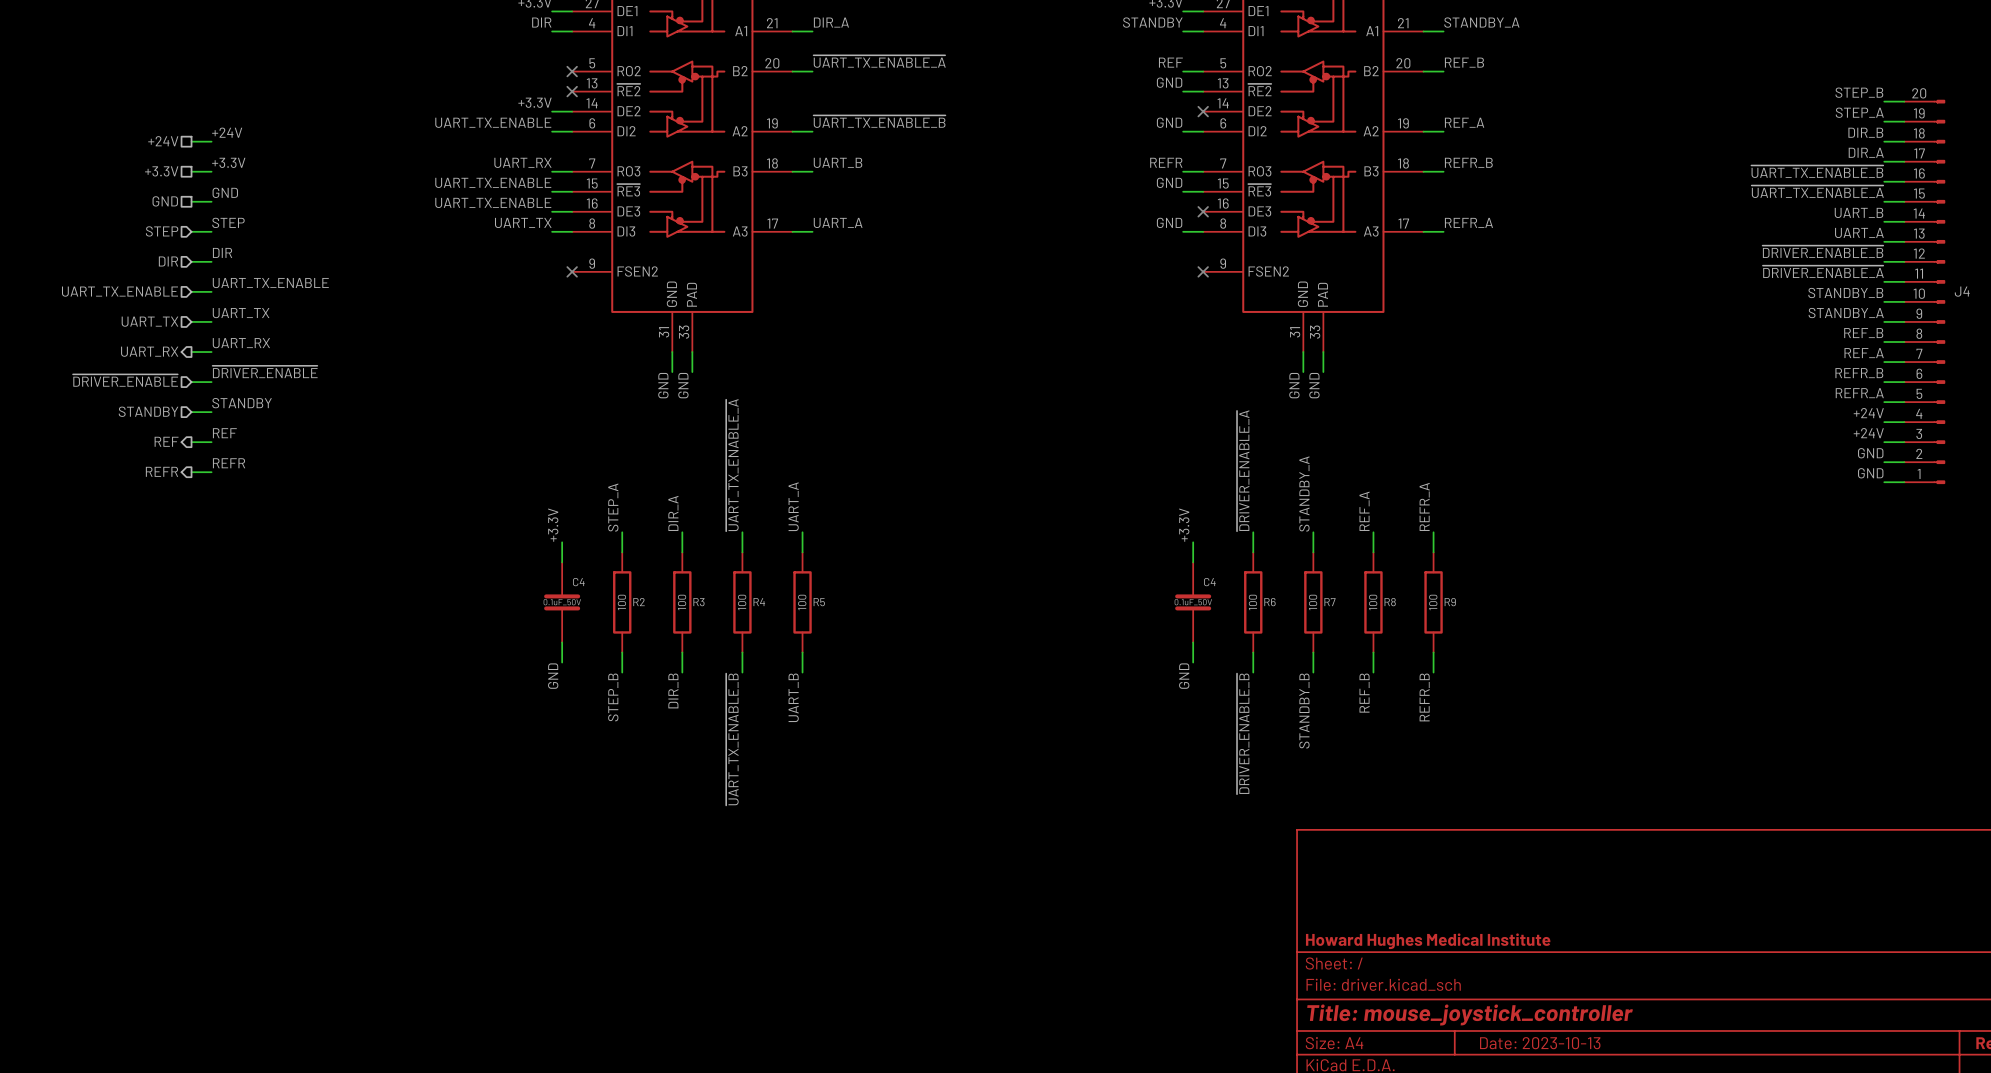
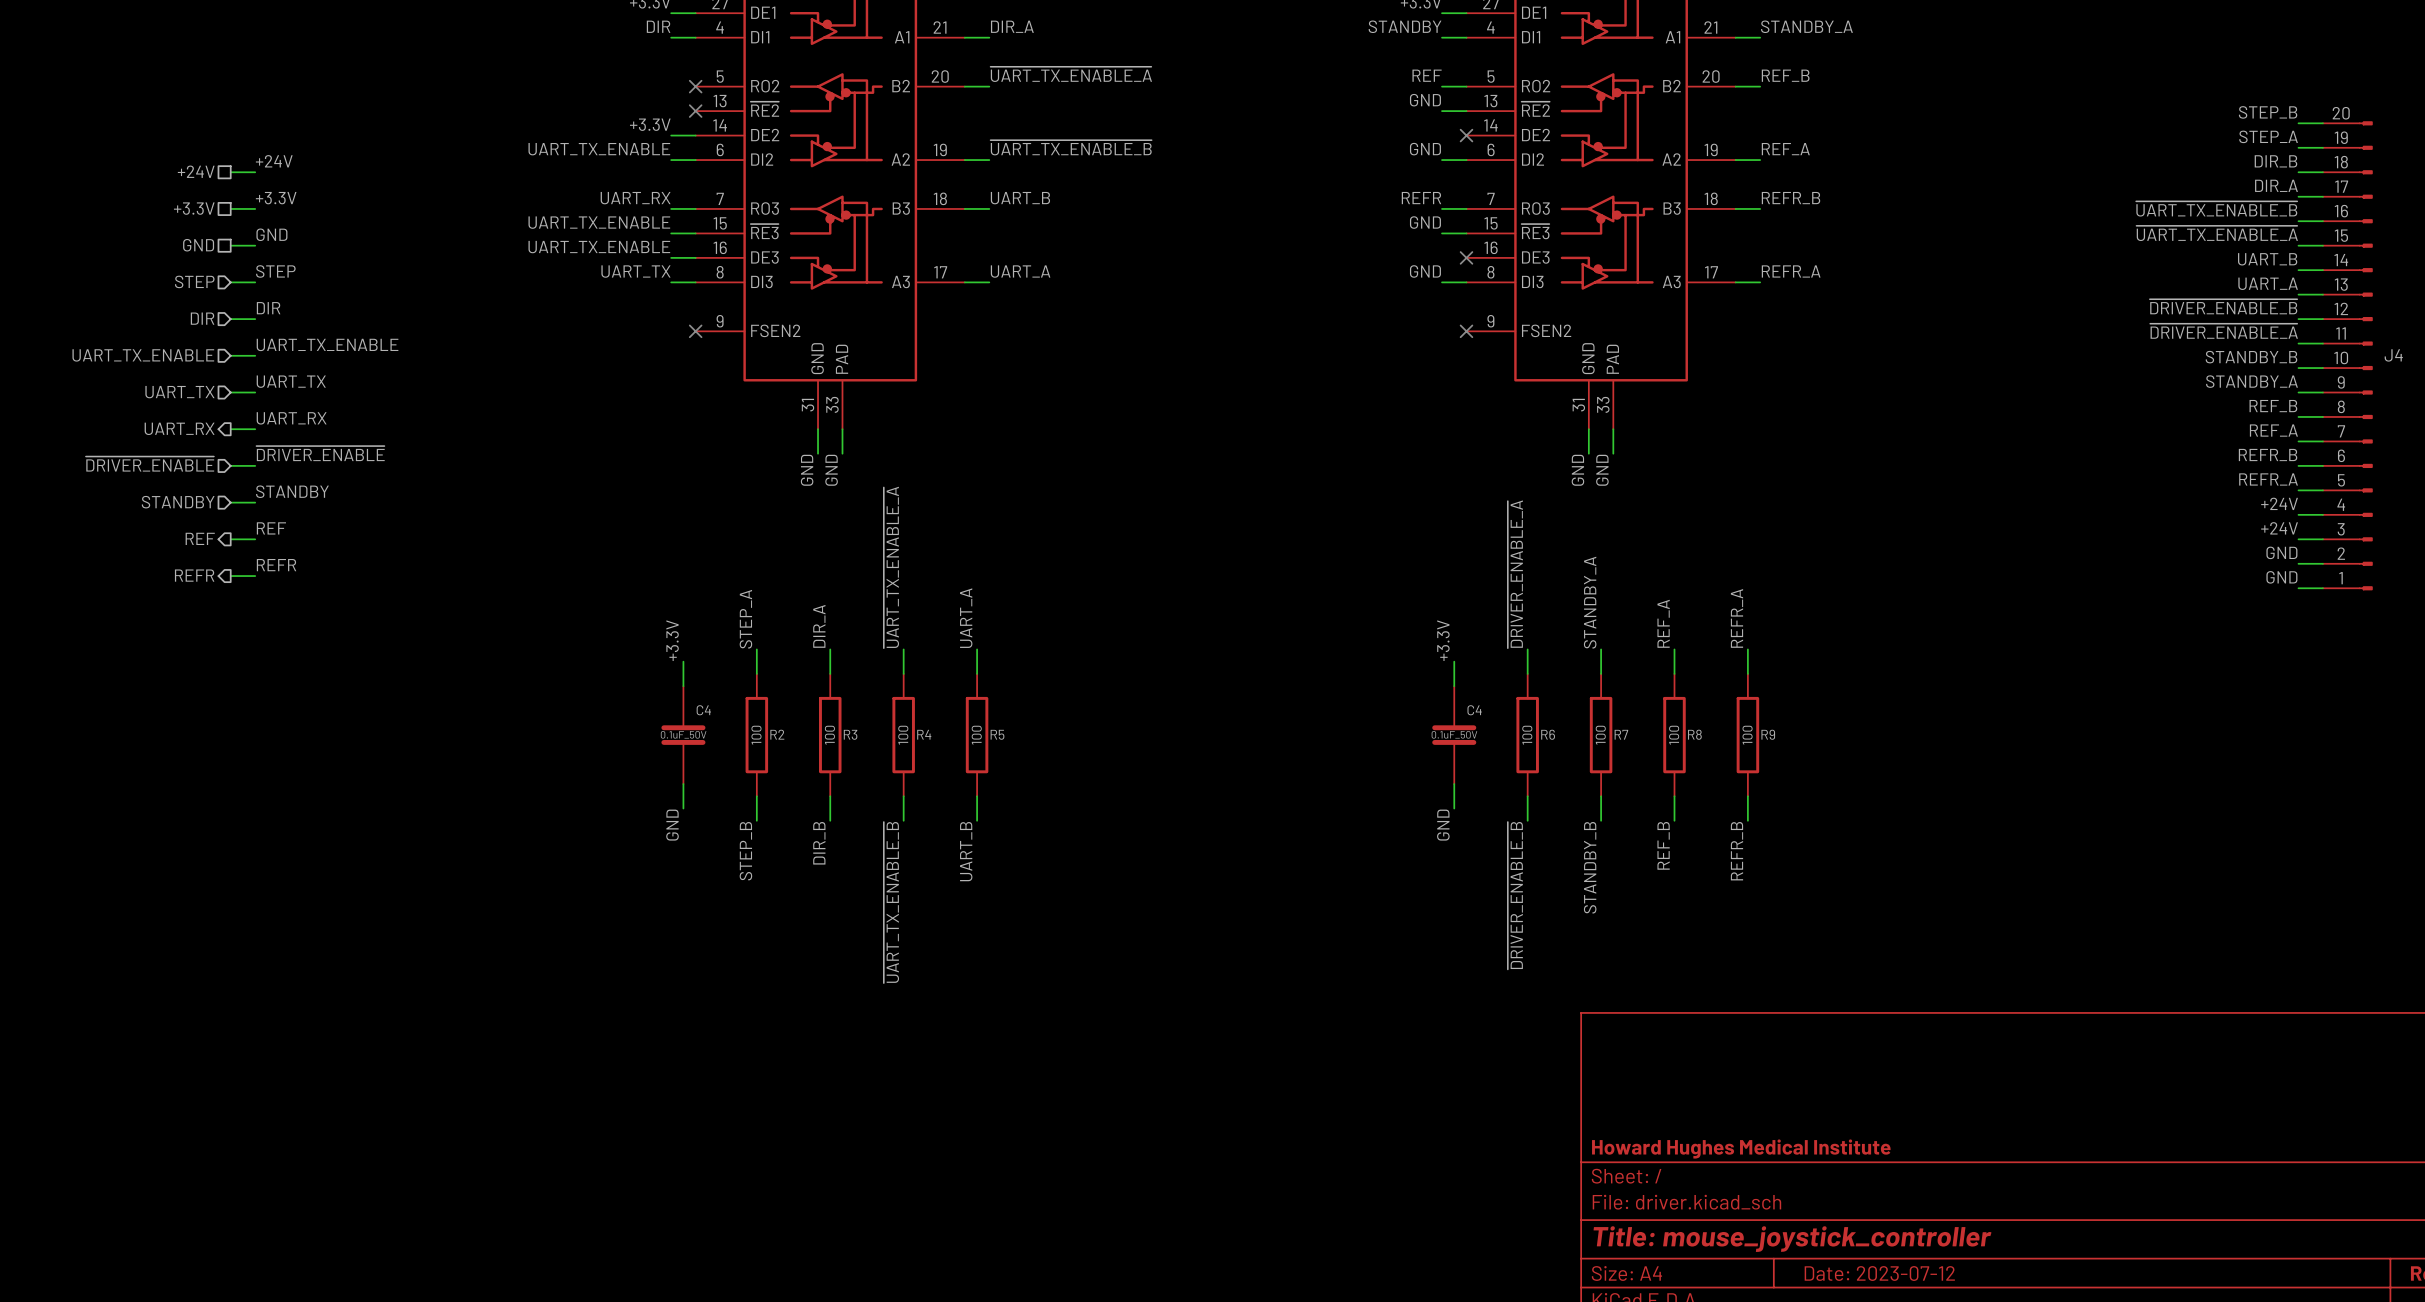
title block: Date: 2023-10-13 (1540, 1043) -> Date: 2023-07-12 (1879, 1273)

